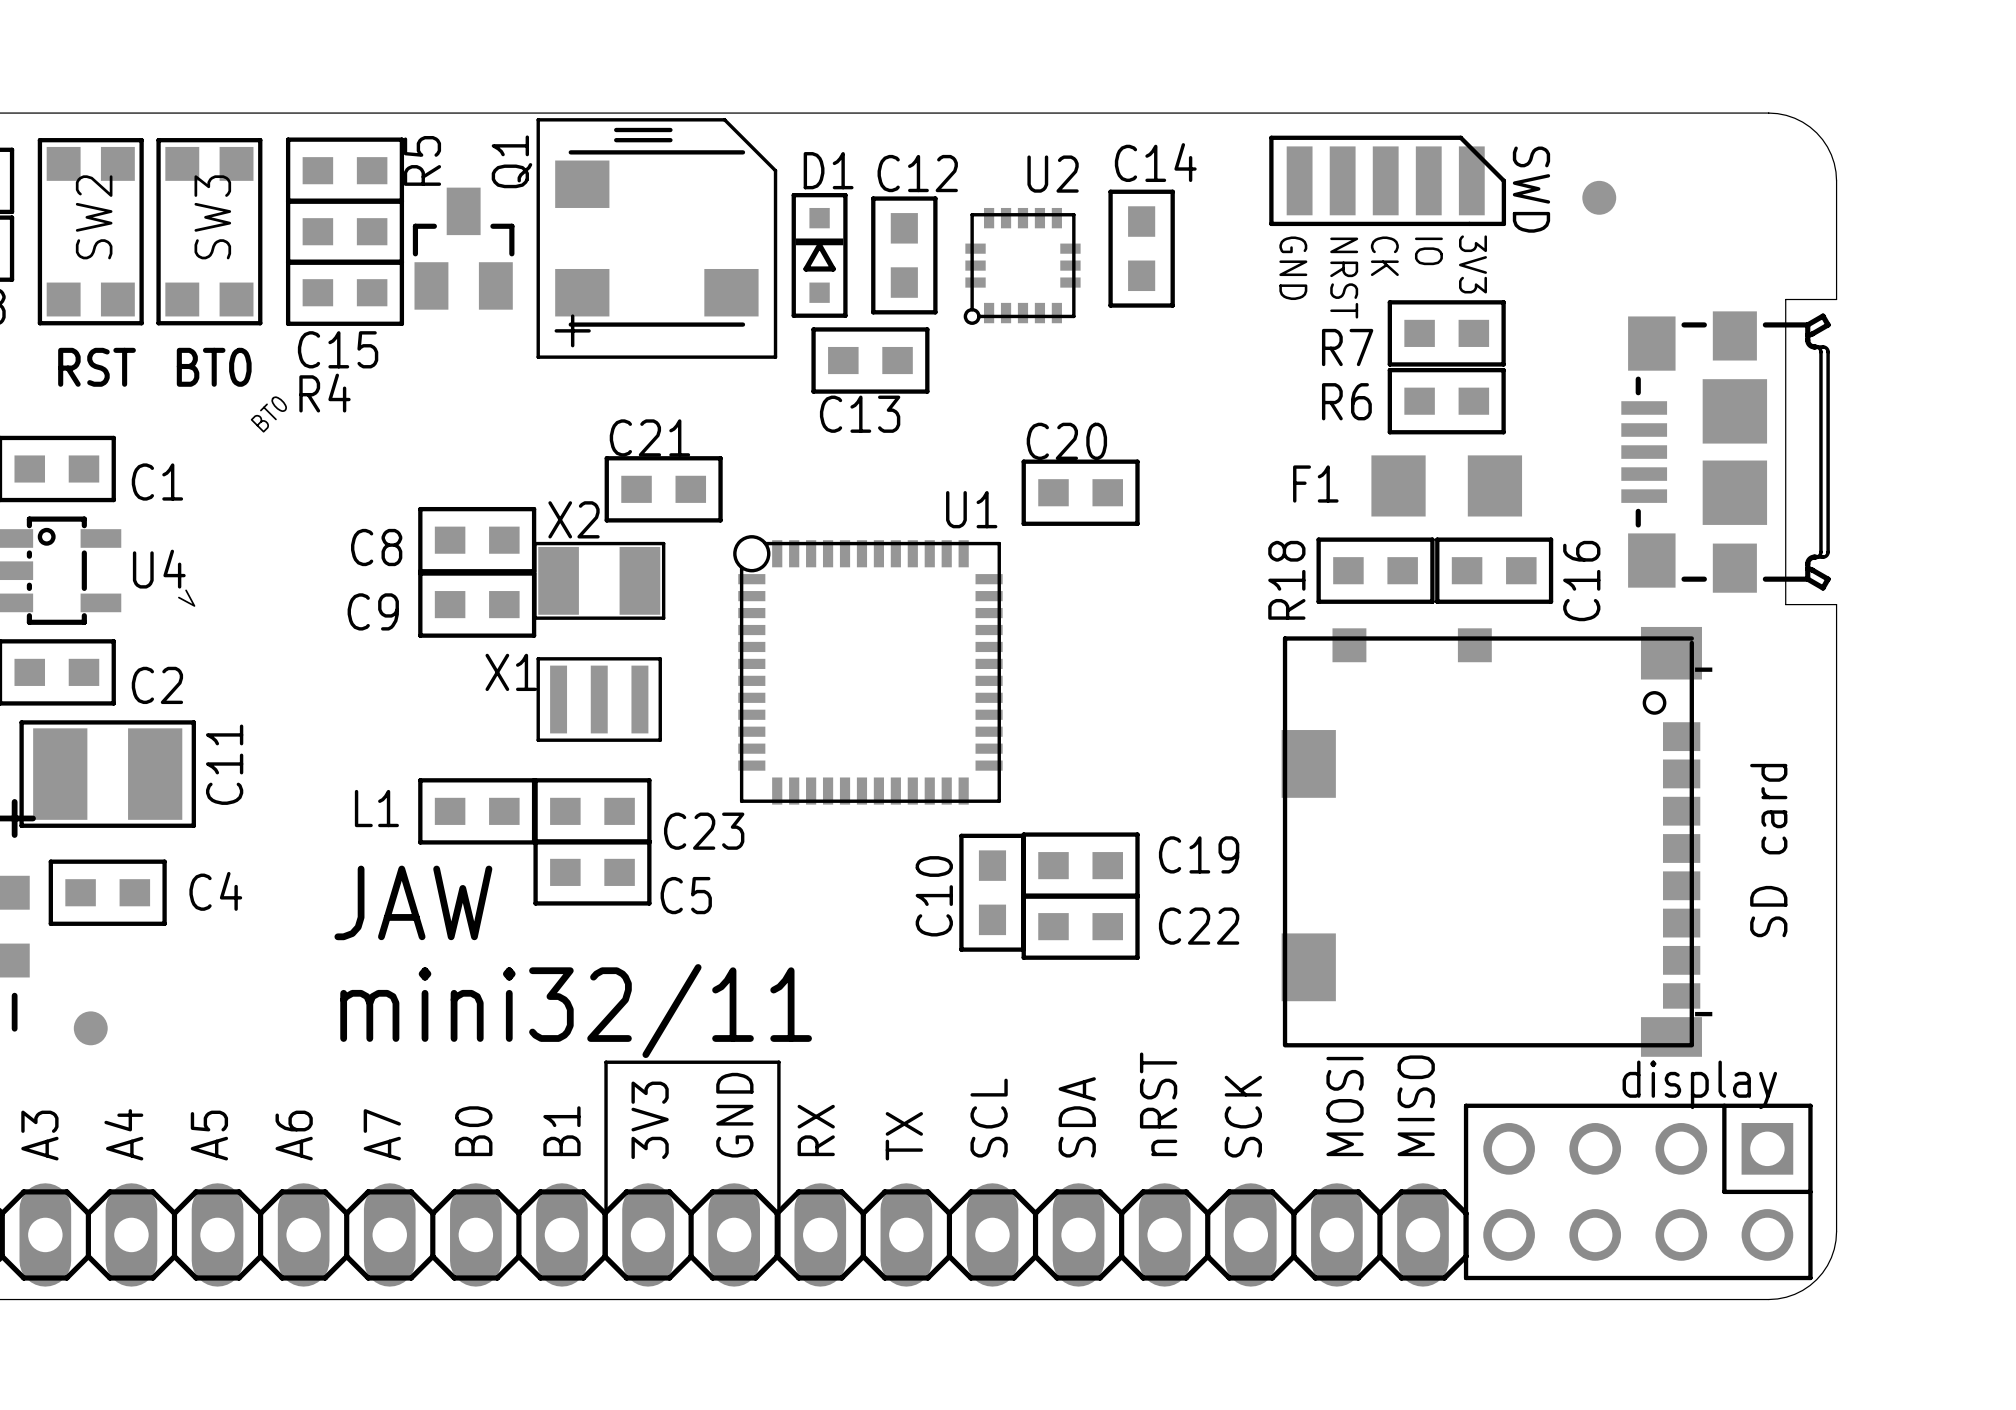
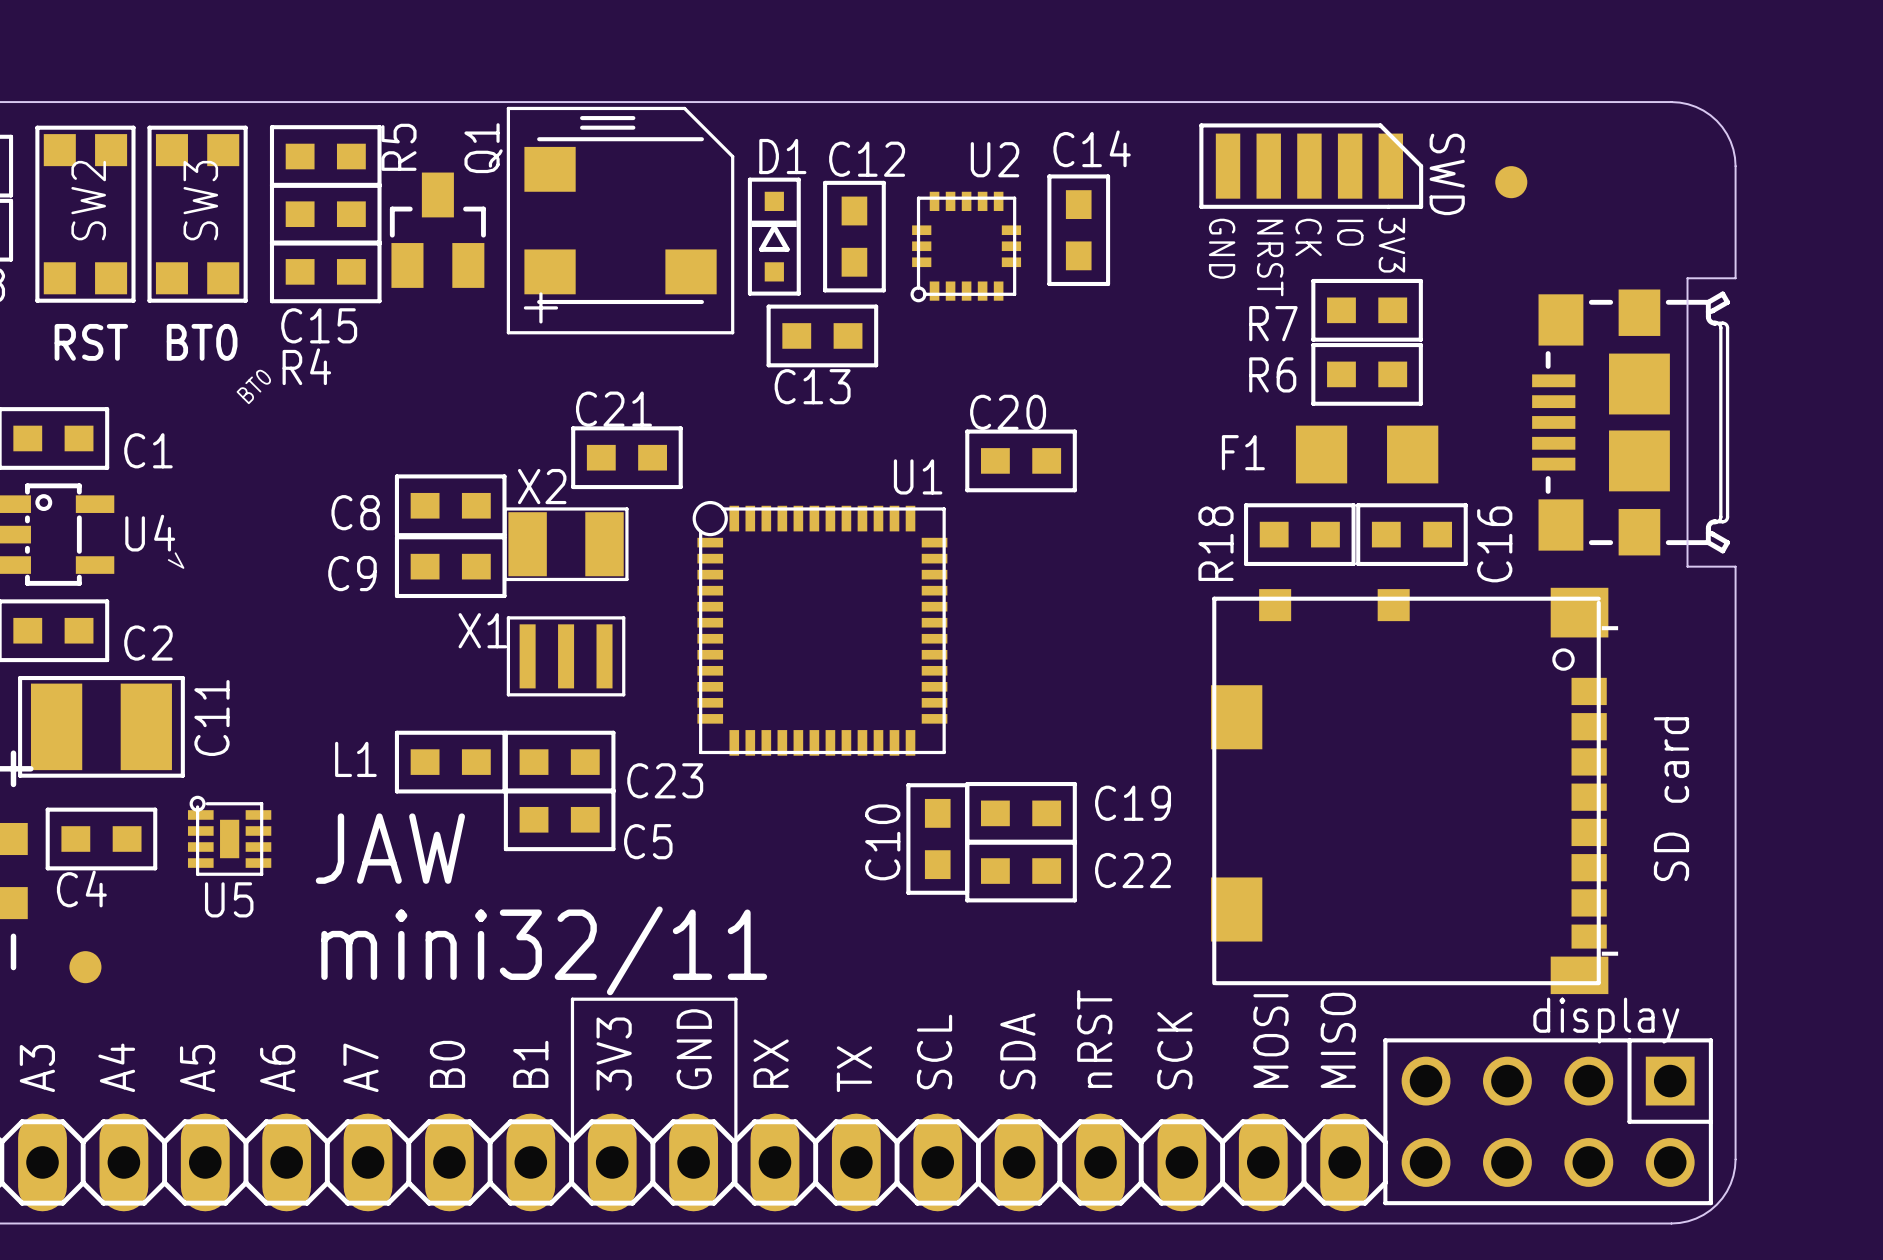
U5: none -> (229, 835)
C4 name position: C4 (215, 891) -> C4 (81, 888)

